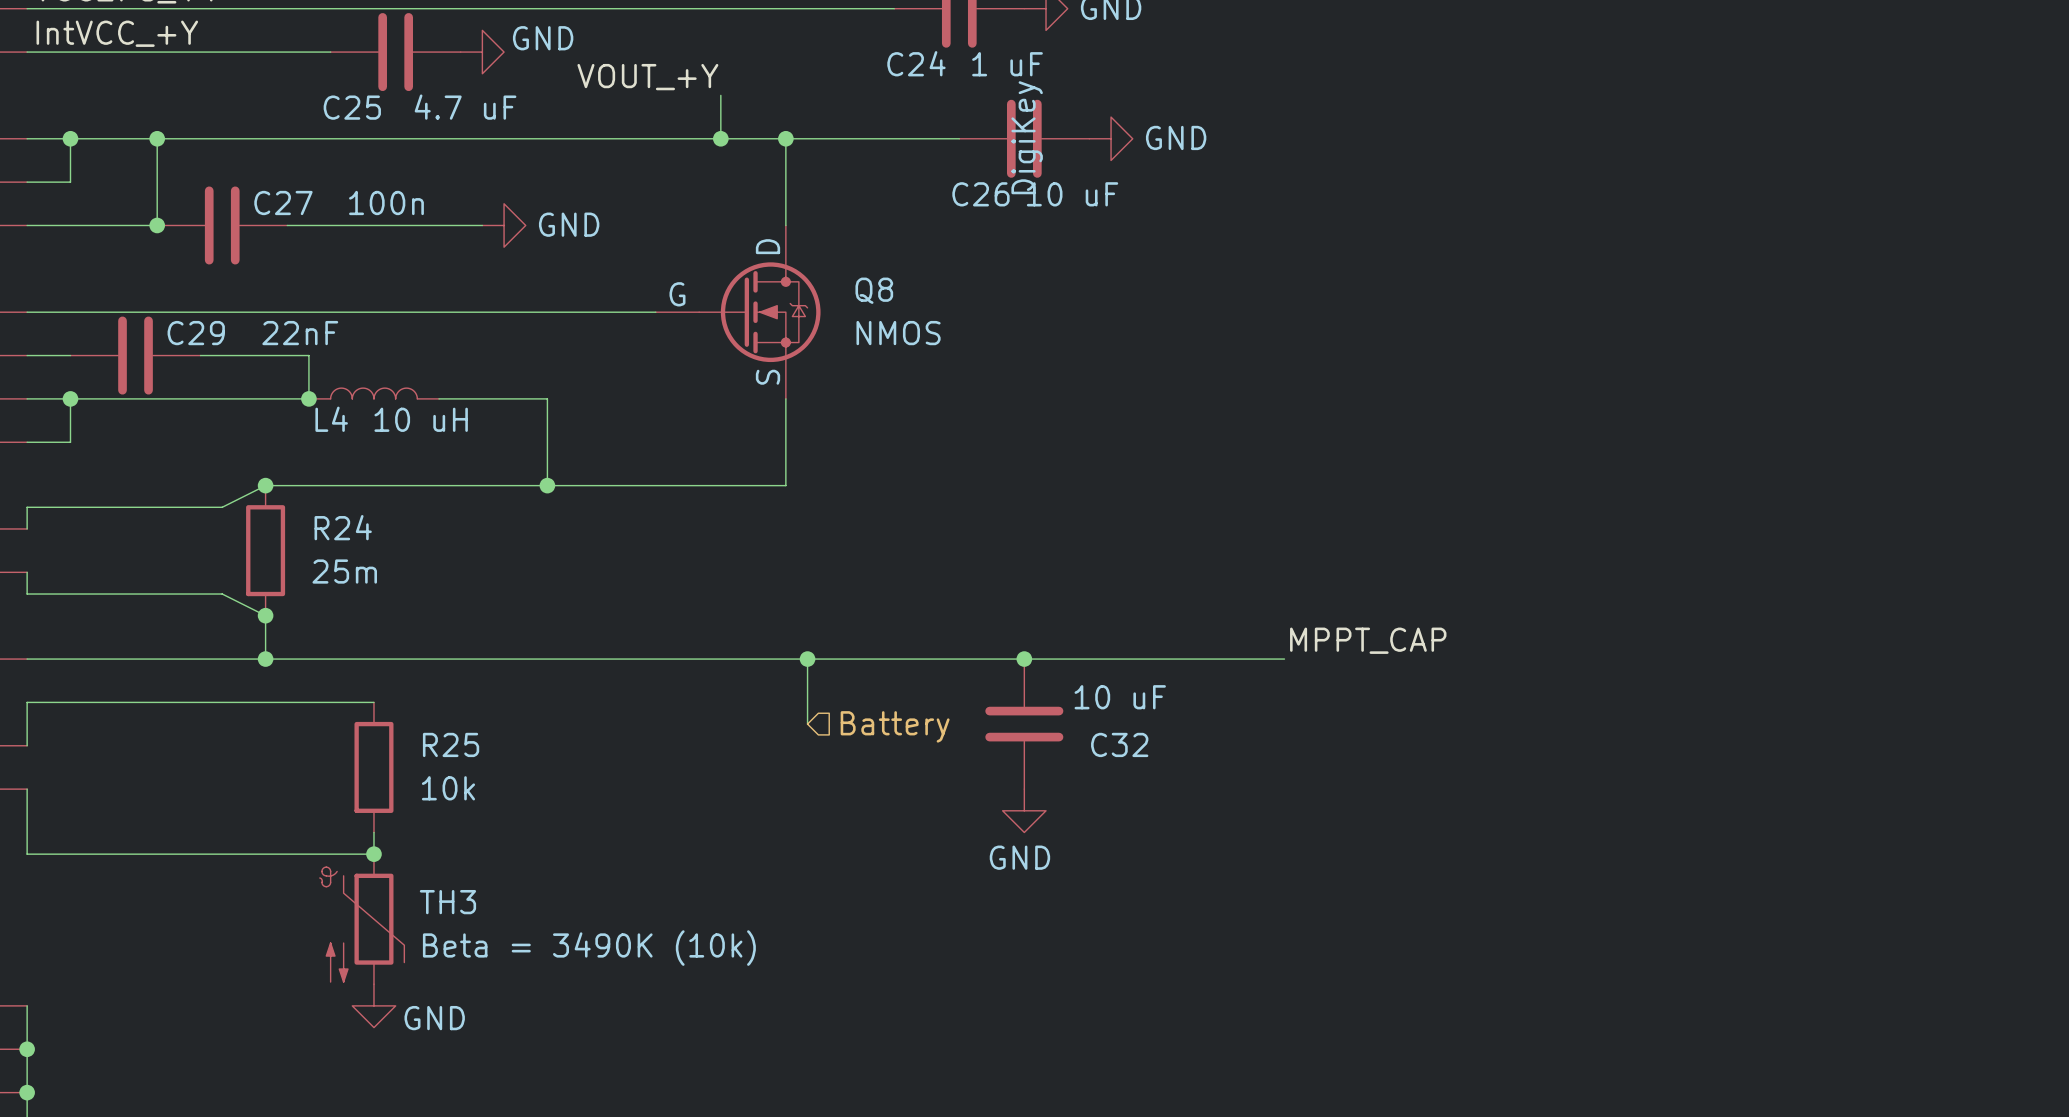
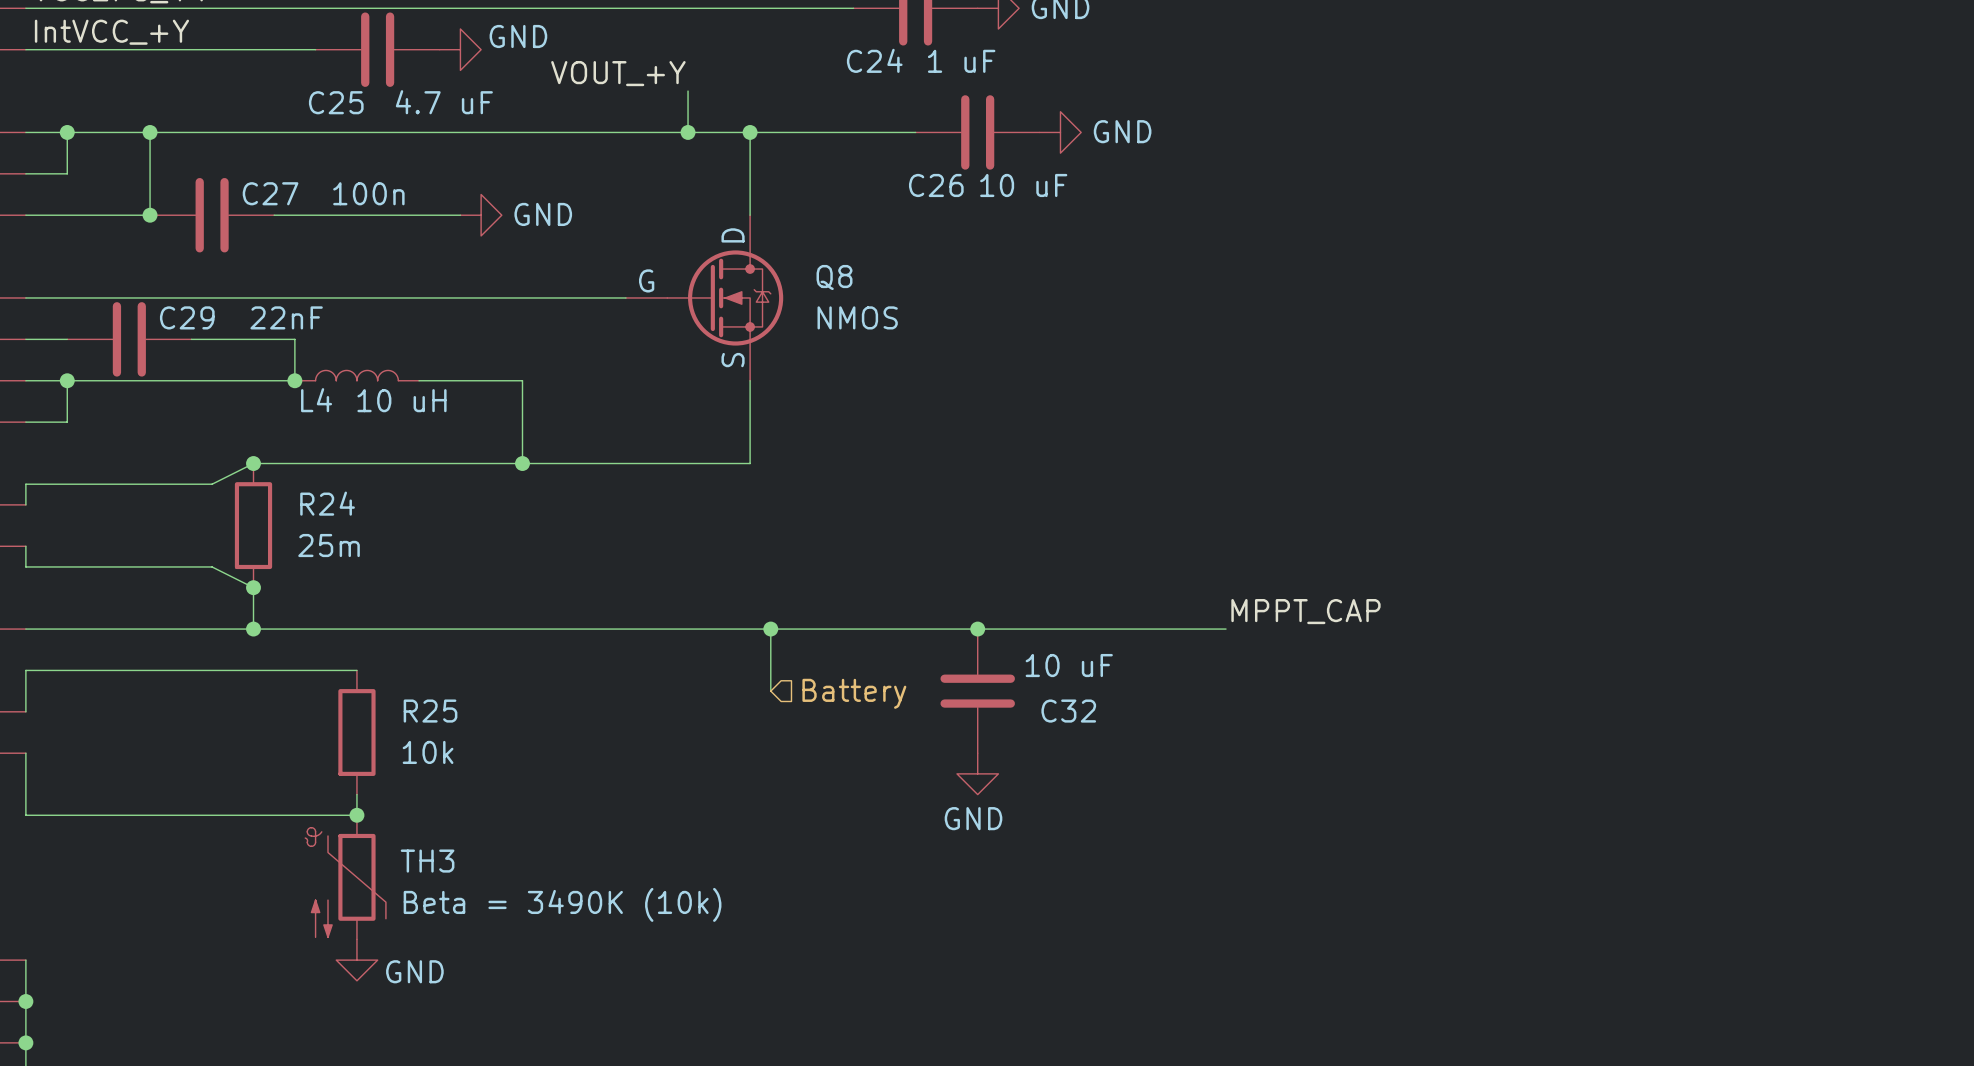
C26 text: DigiKey (1027, 137) -> none

